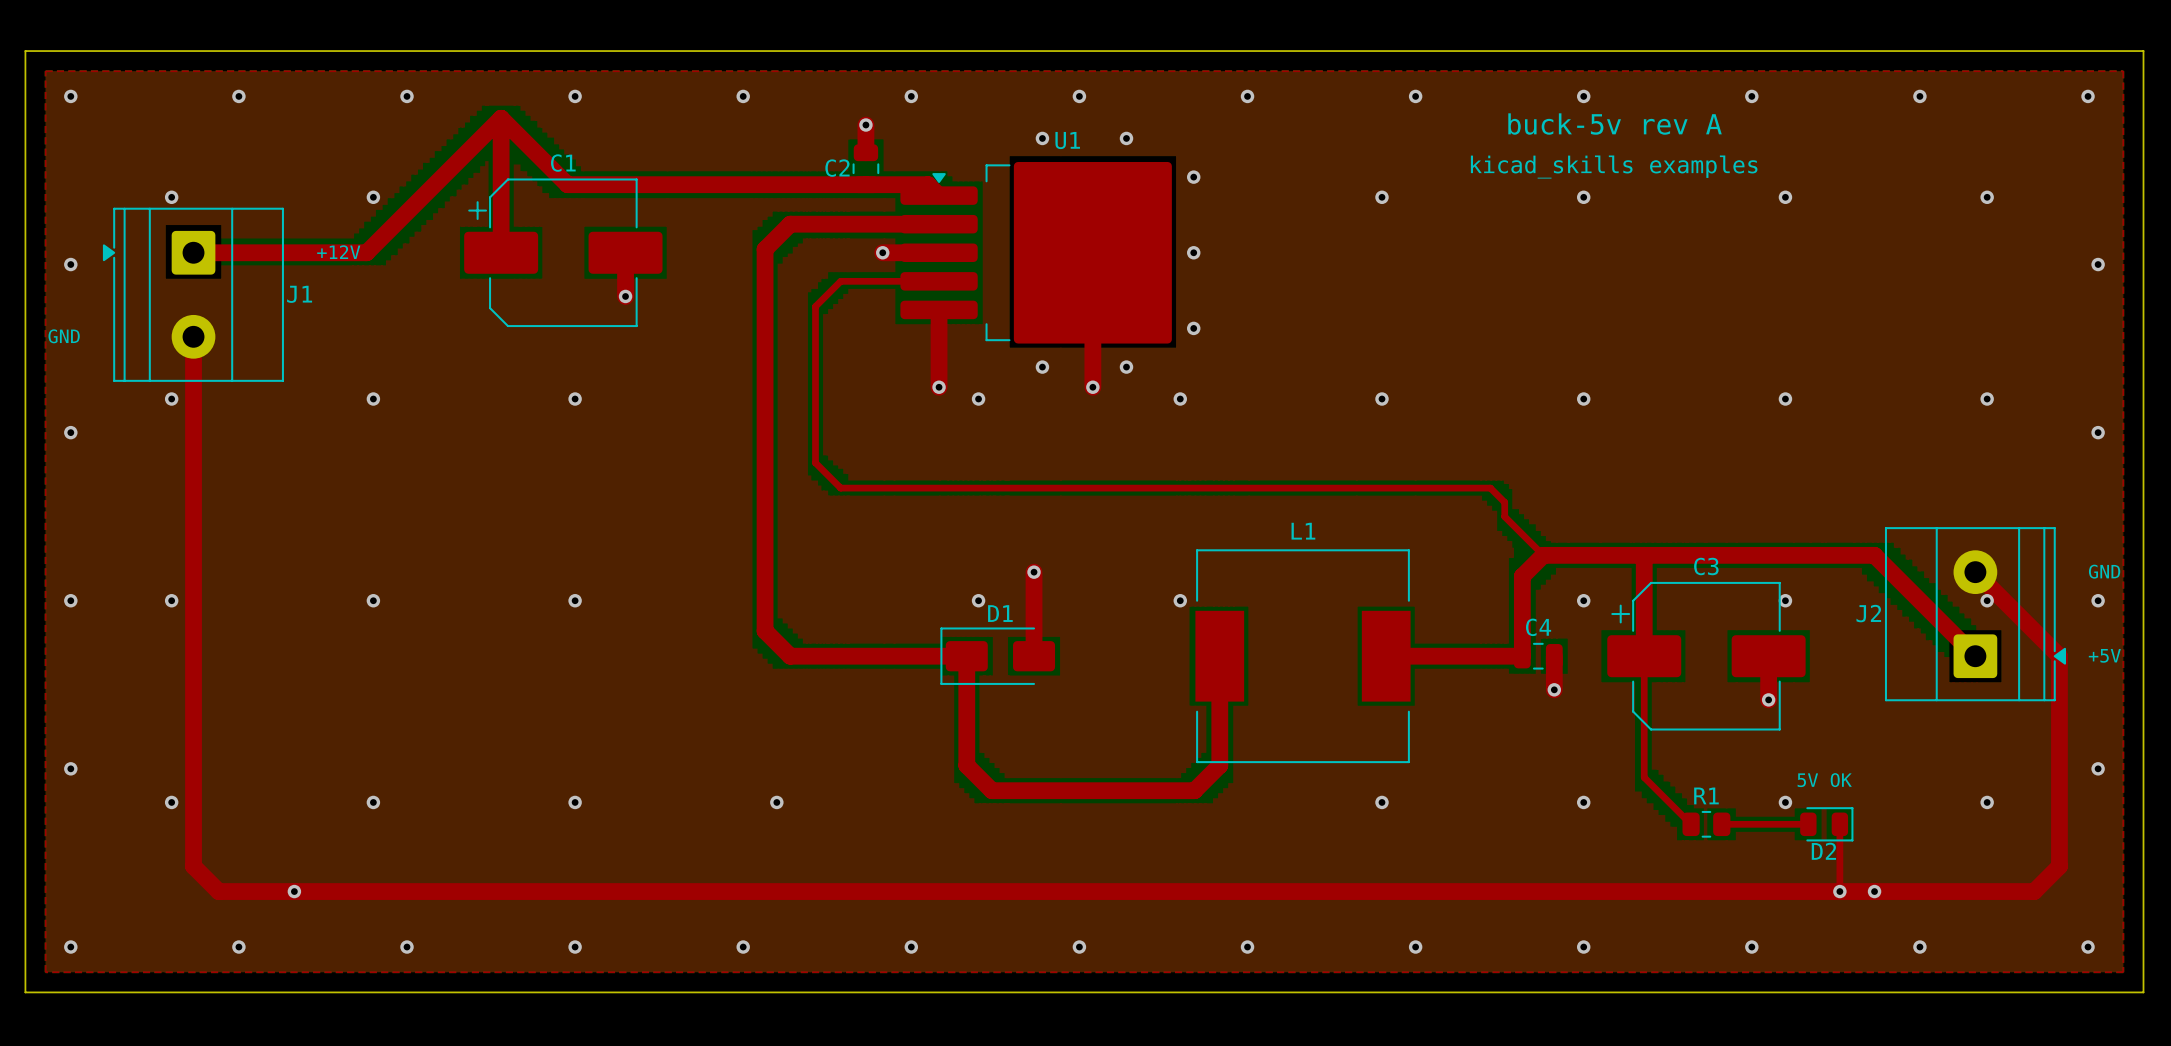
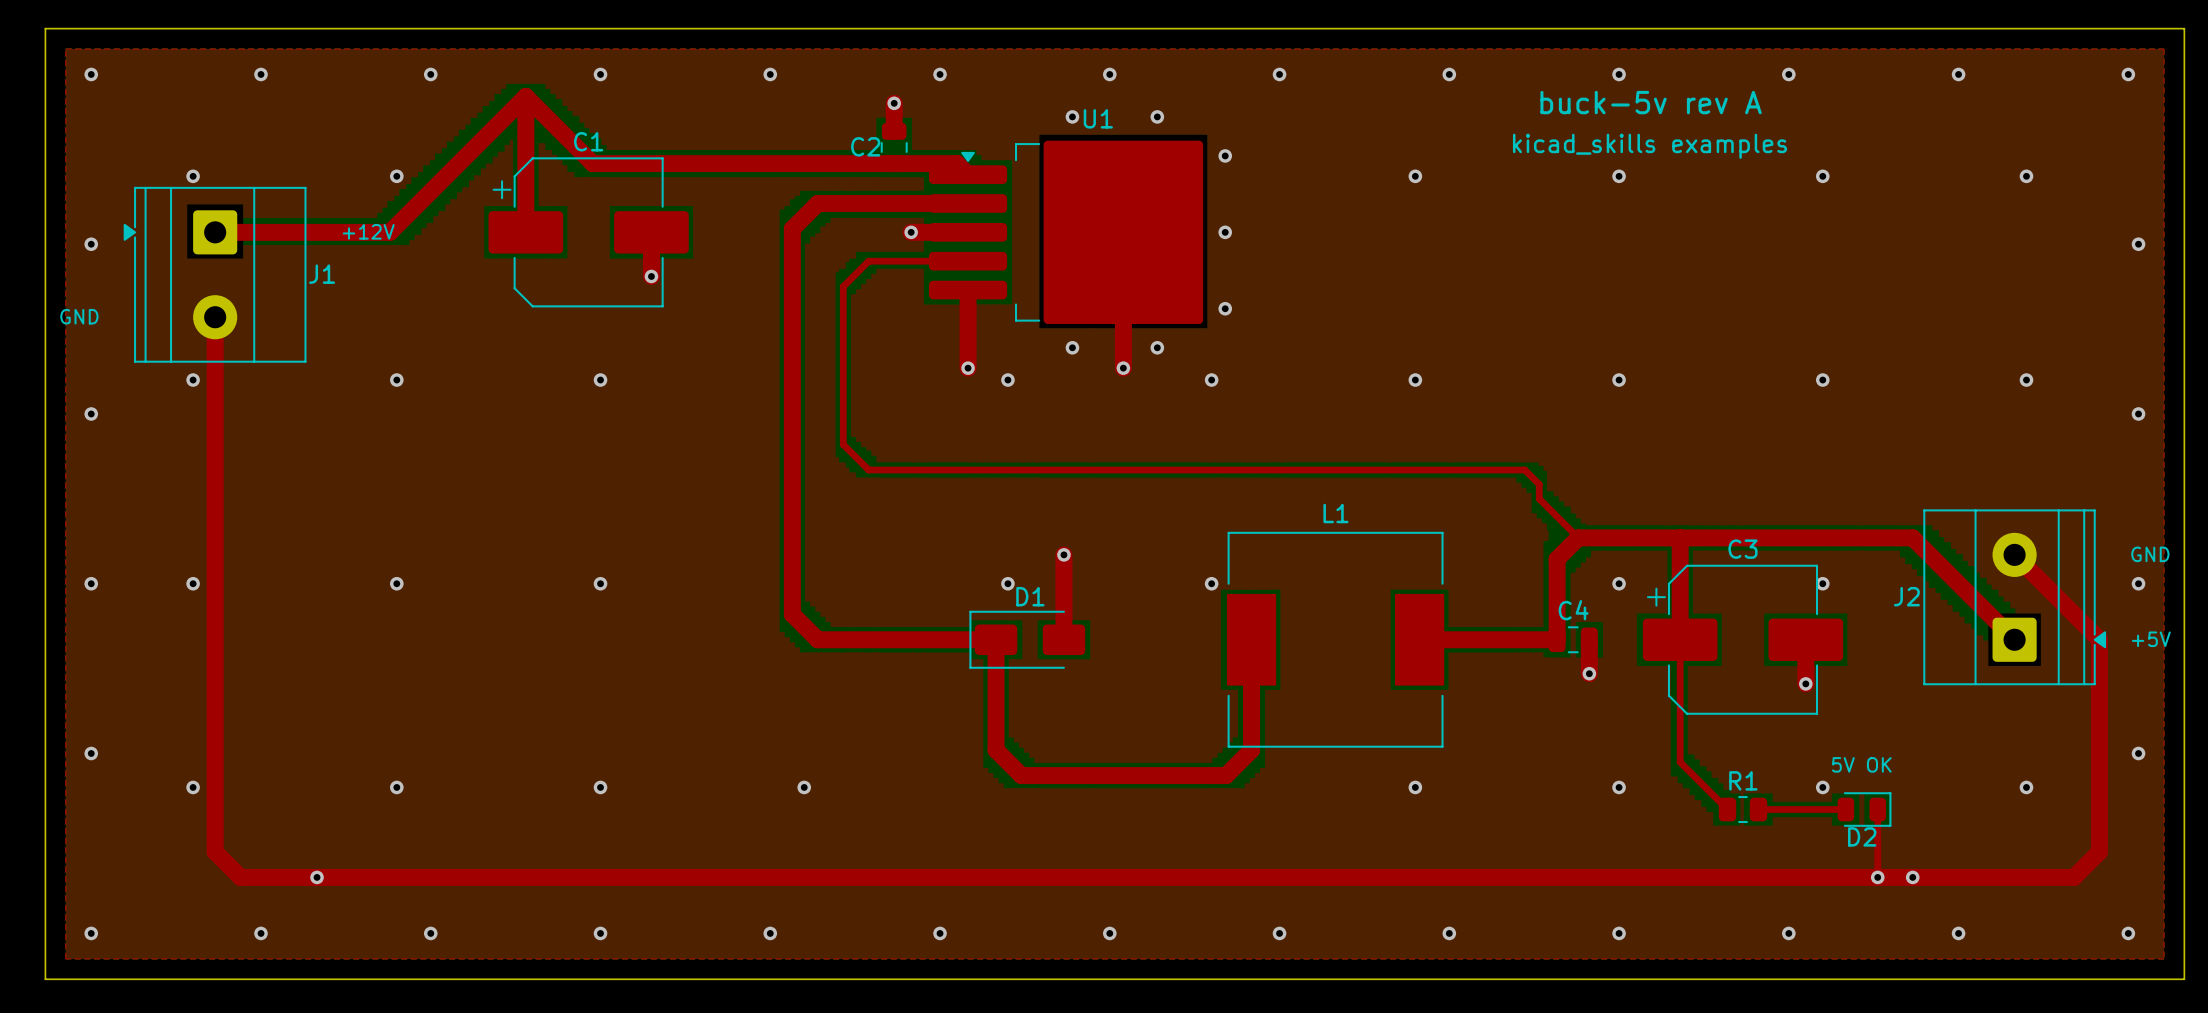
via: (1987, 600) -> none

